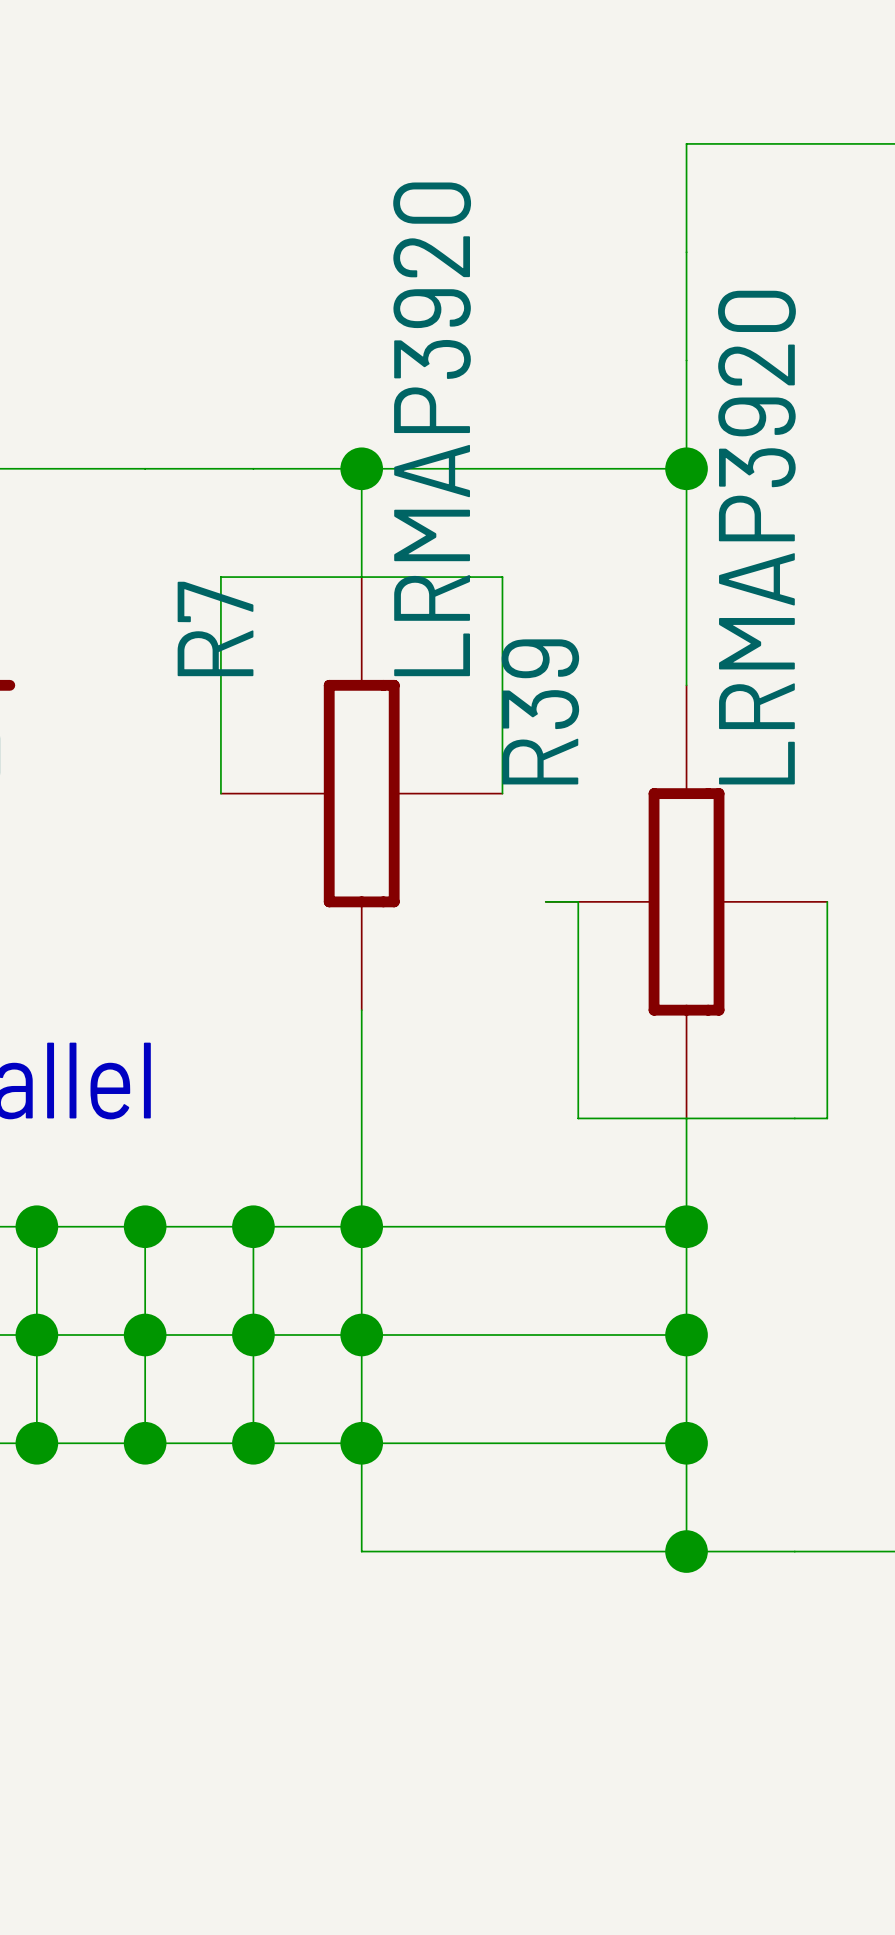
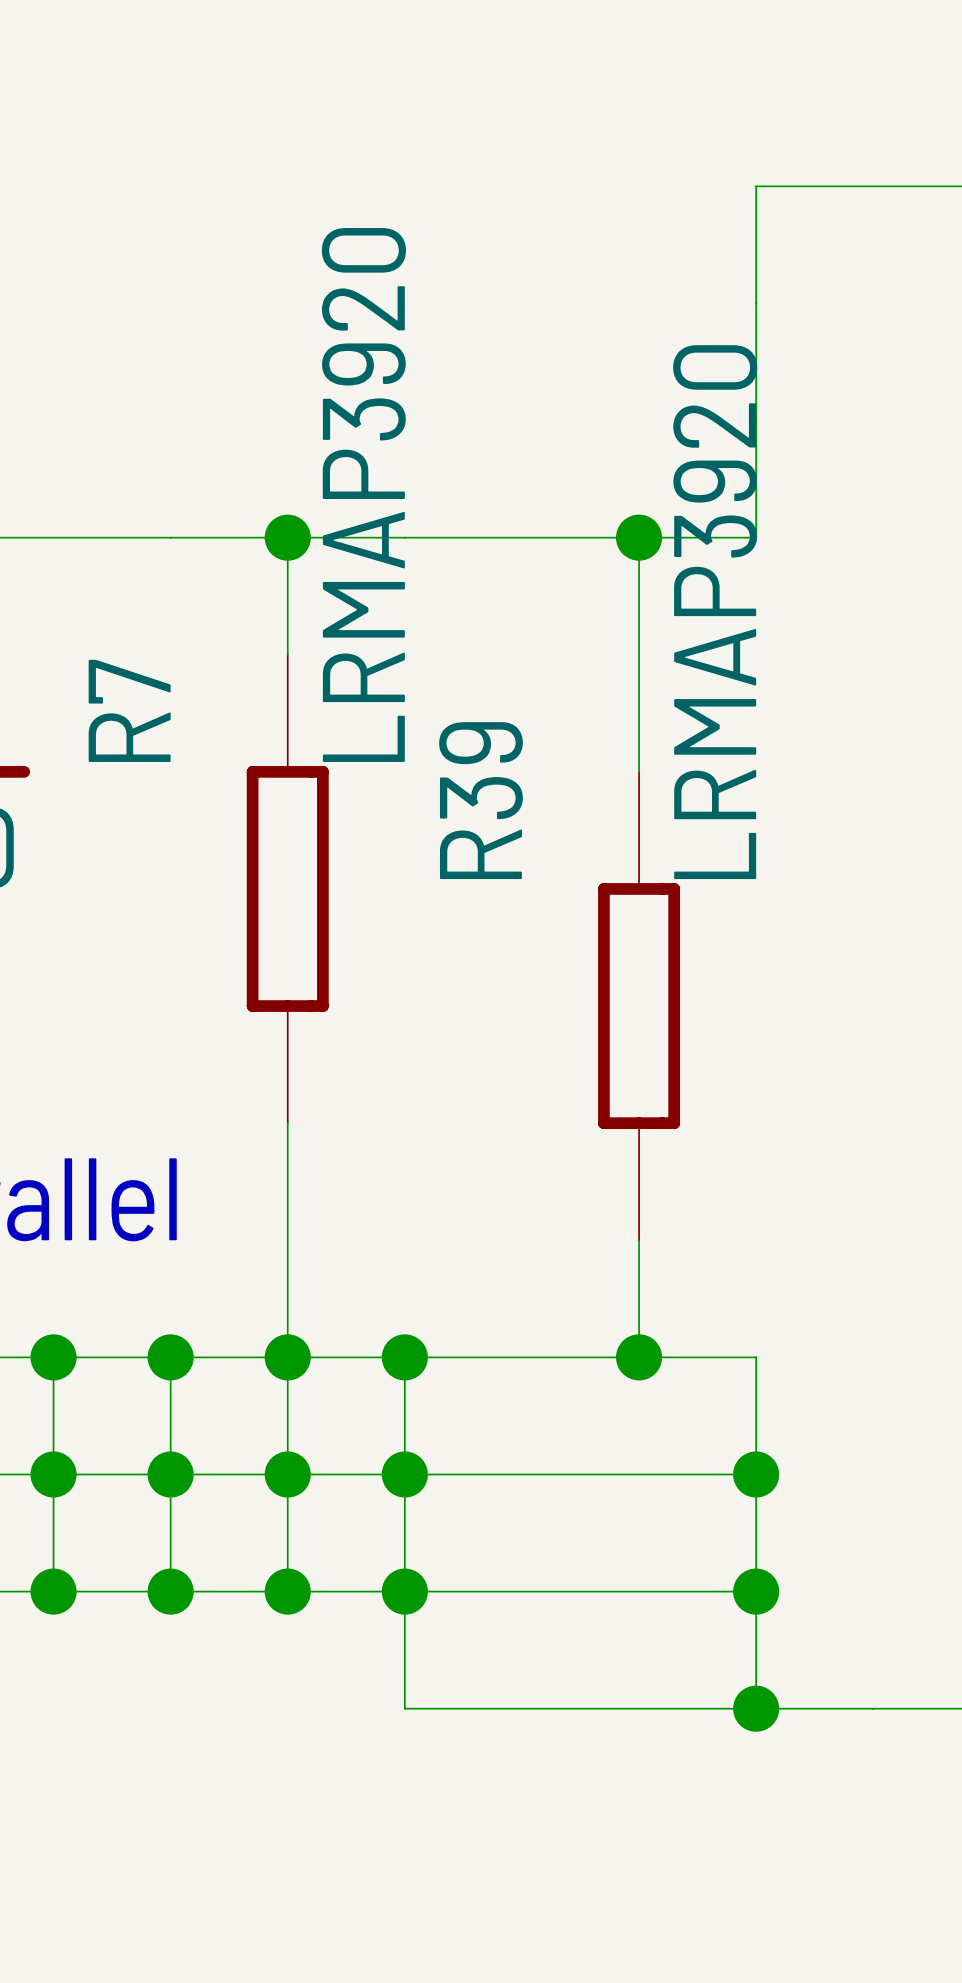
junction: none -> (287, 537)
wire: (361, 468) (361, 577) -> (287, 537) (287, 654)
junction: (361, 468) -> none
junction: none -> (639, 537)
wire: (686, 468) (686, 685) -> (639, 537) (639, 771)
junction: (686, 468) -> none
R7 symbol: [220, 577, 503, 1011] -> [246, 654, 329, 1124]
R39 symbol: [545, 685, 828, 1119] -> [598, 771, 681, 1241]
wire: (220, 793) (220, 577) (502, 577) (502, 793) -> none
wire: (545, 901) (578, 901) (578, 1118) (827, 1118) (827, 901) -> none
wire: (361, 1010) (361, 1226) -> (287, 1123) (287, 1357)
wire: (686, 1118) (686, 1226) -> (639, 1240) (639, 1357)
junction position: (686, 1226) -> (639, 1357)

